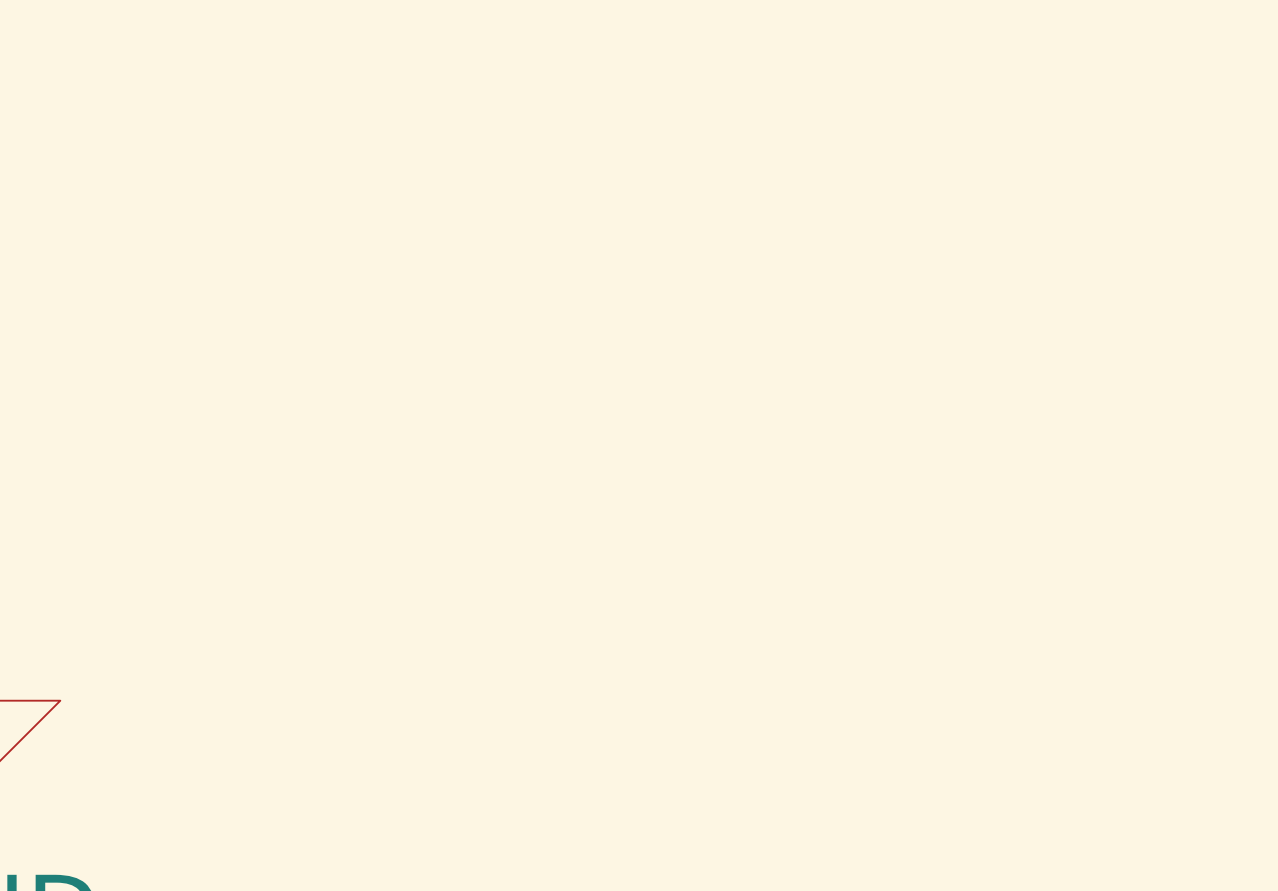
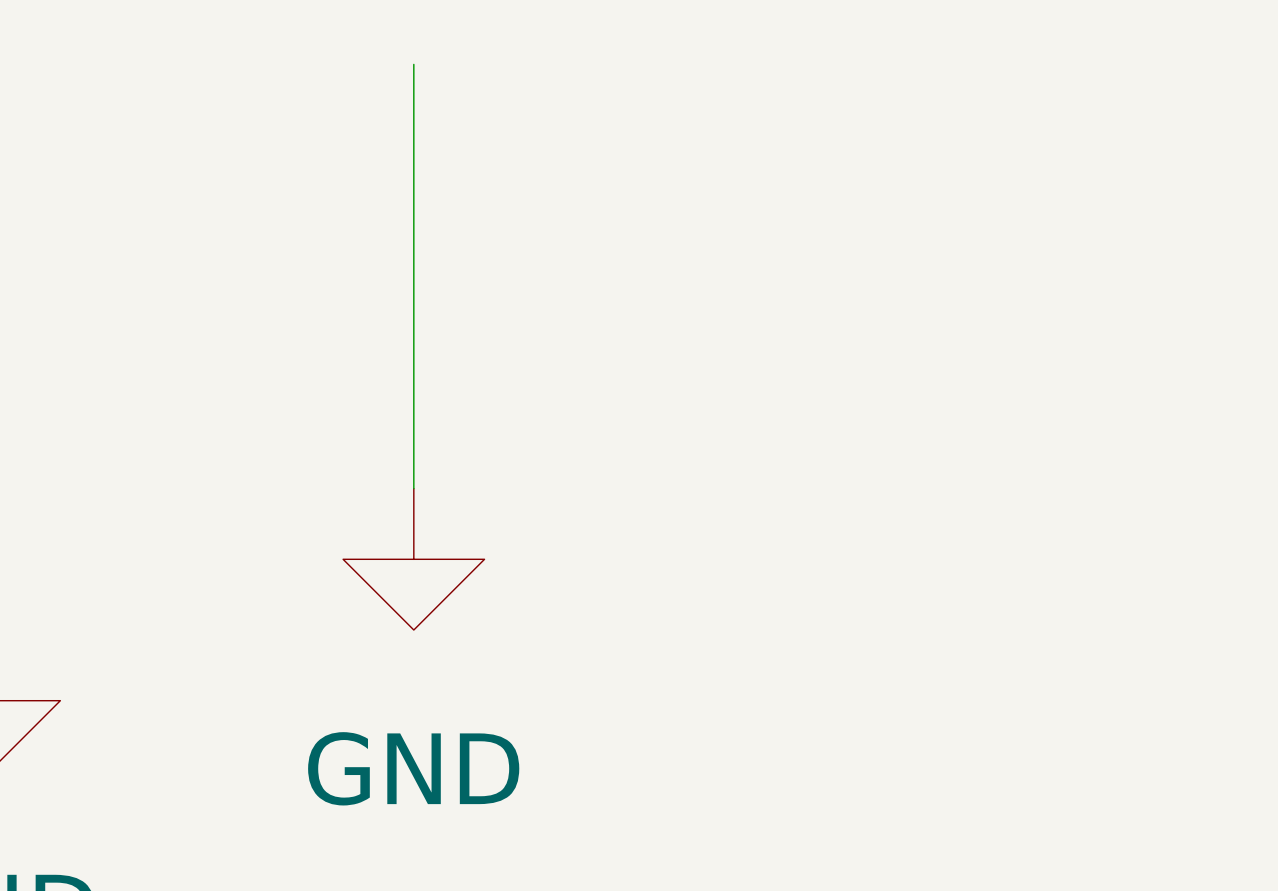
wire: none -> (413, 64) (413, 488)
power symbol: none -> GND (413, 559)

